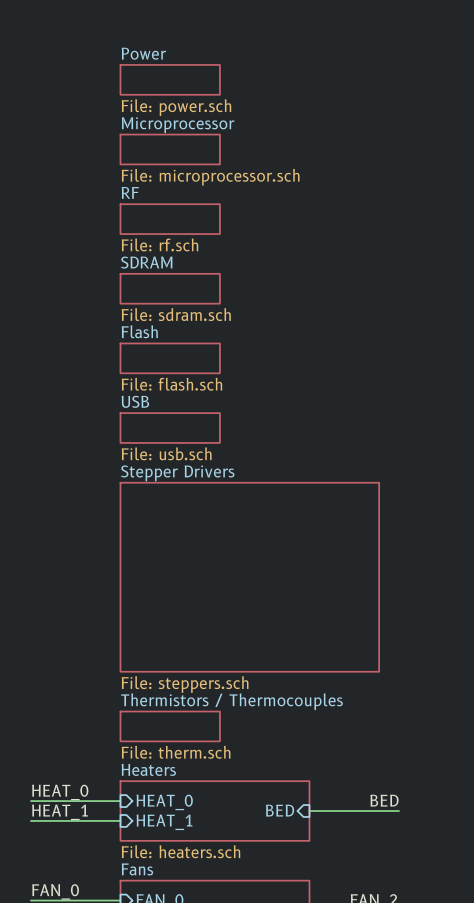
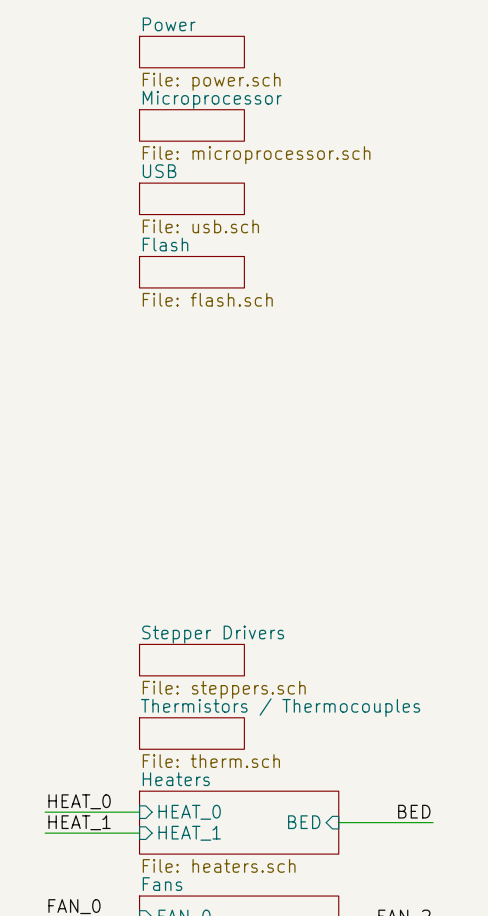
sheet RF name: RF (130, 192) -> USB (159, 171)
sheet RF value: File: rf.sch (159, 244) -> File: usb.sch (200, 226)
sheet SDRAM name: SDRAM (146, 262) -> Flash (165, 244)
sheet SDRAM value: File: sdram.sch (176, 314) -> File: flash.sch (207, 299)
sheet Flash: File: flash.sch (170, 358) -> none
sheet USB: File: usb.sch (170, 428) -> none
sheet Stepper Drivers: File: steppers.sch (249, 577) -> none
sheet Stepper Drivers: none -> File: steppers.sch (191, 660)

